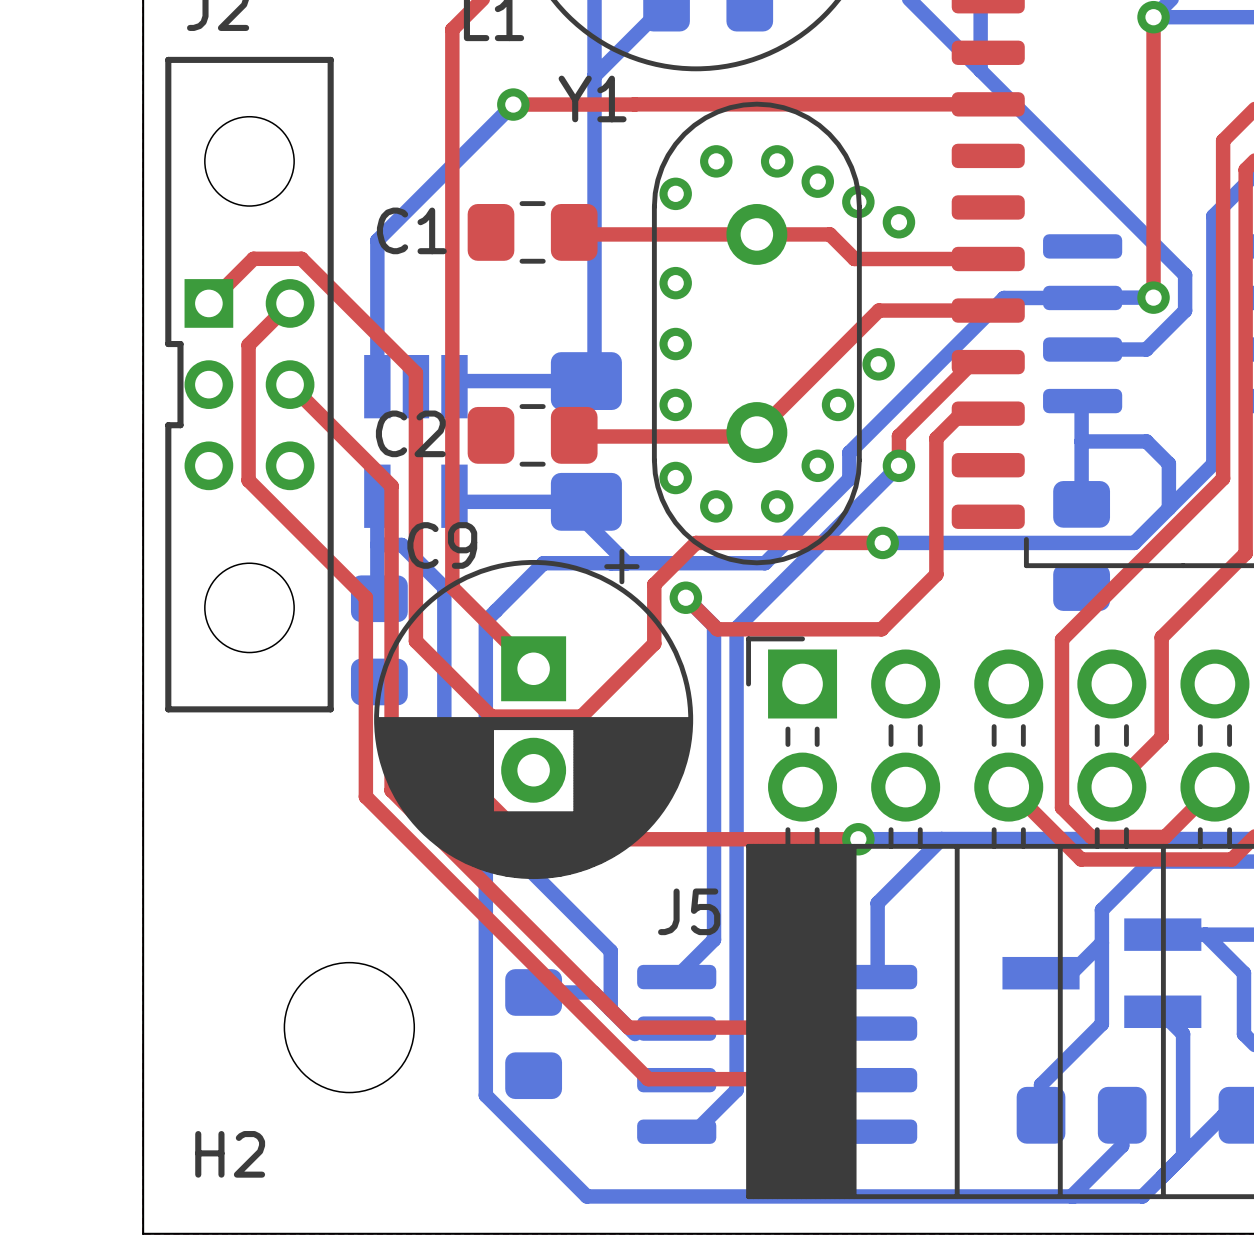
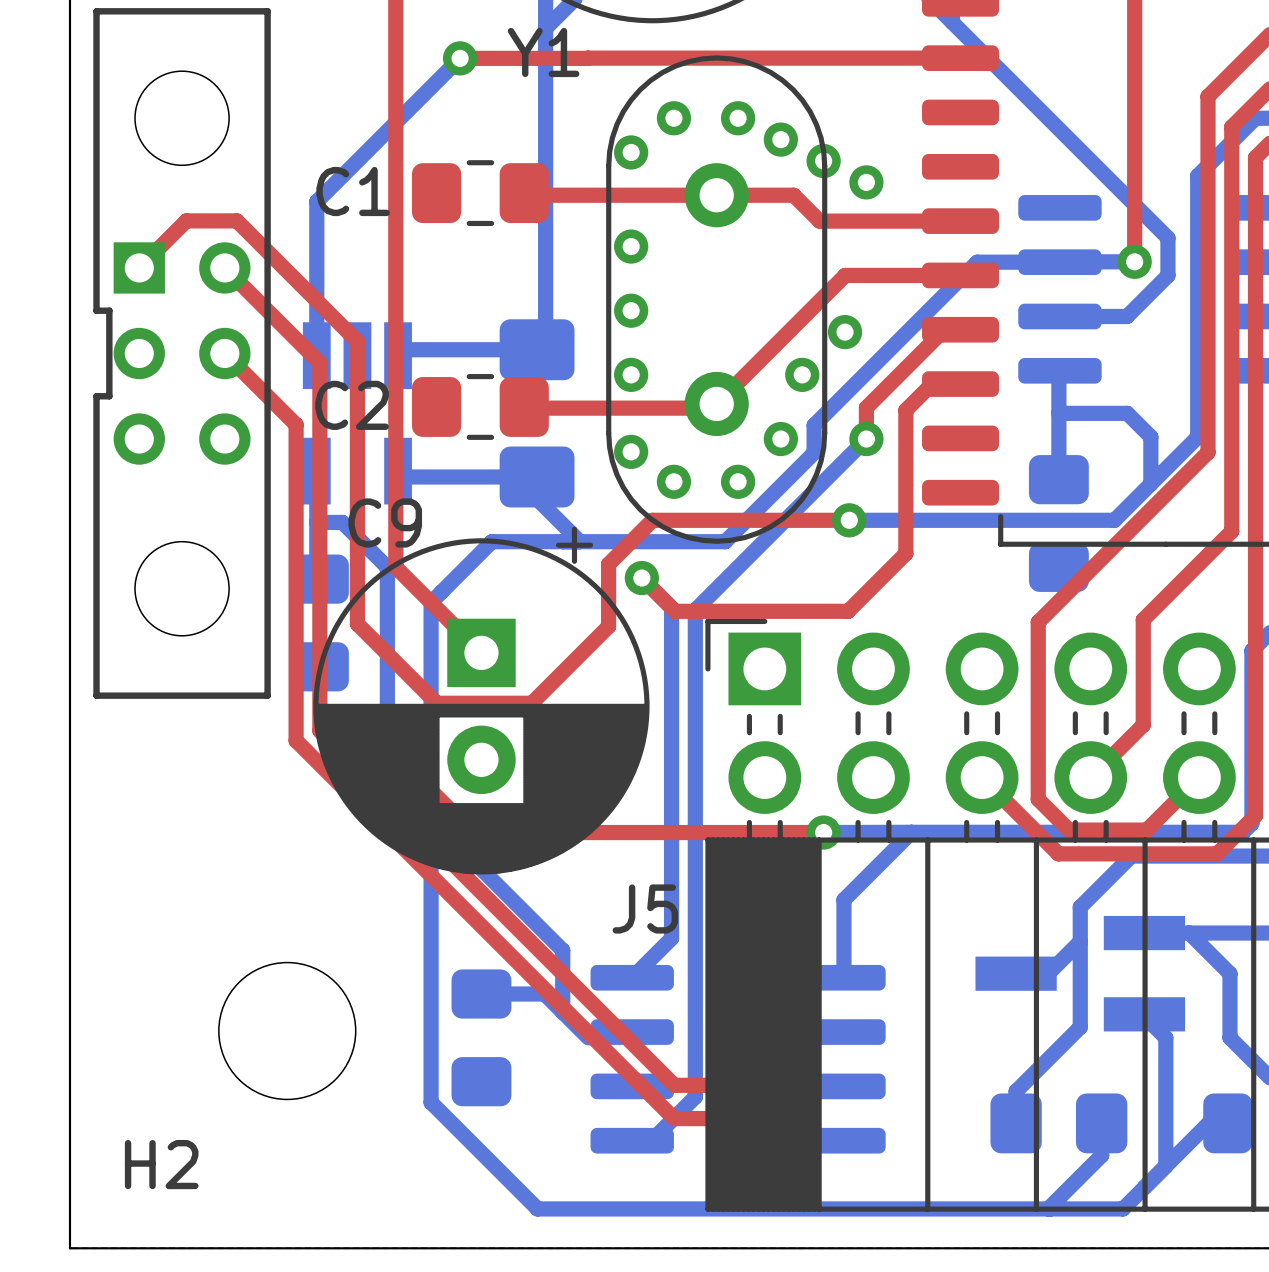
top track: (290, 303) (248, 344) (248, 480) (365, 597) (365, 796) (648, 1079) (716, 1079) -> (224, 267) (319, 362) (319, 730) (674, 1085)
top track: (357, 452) (391, 486) (391, 790) (628, 1027) (802, 1027) -> (296, 424) (296, 740) (674, 1118) (779, 1118) (798, 1099) (798, 1064) (765, 1031)

